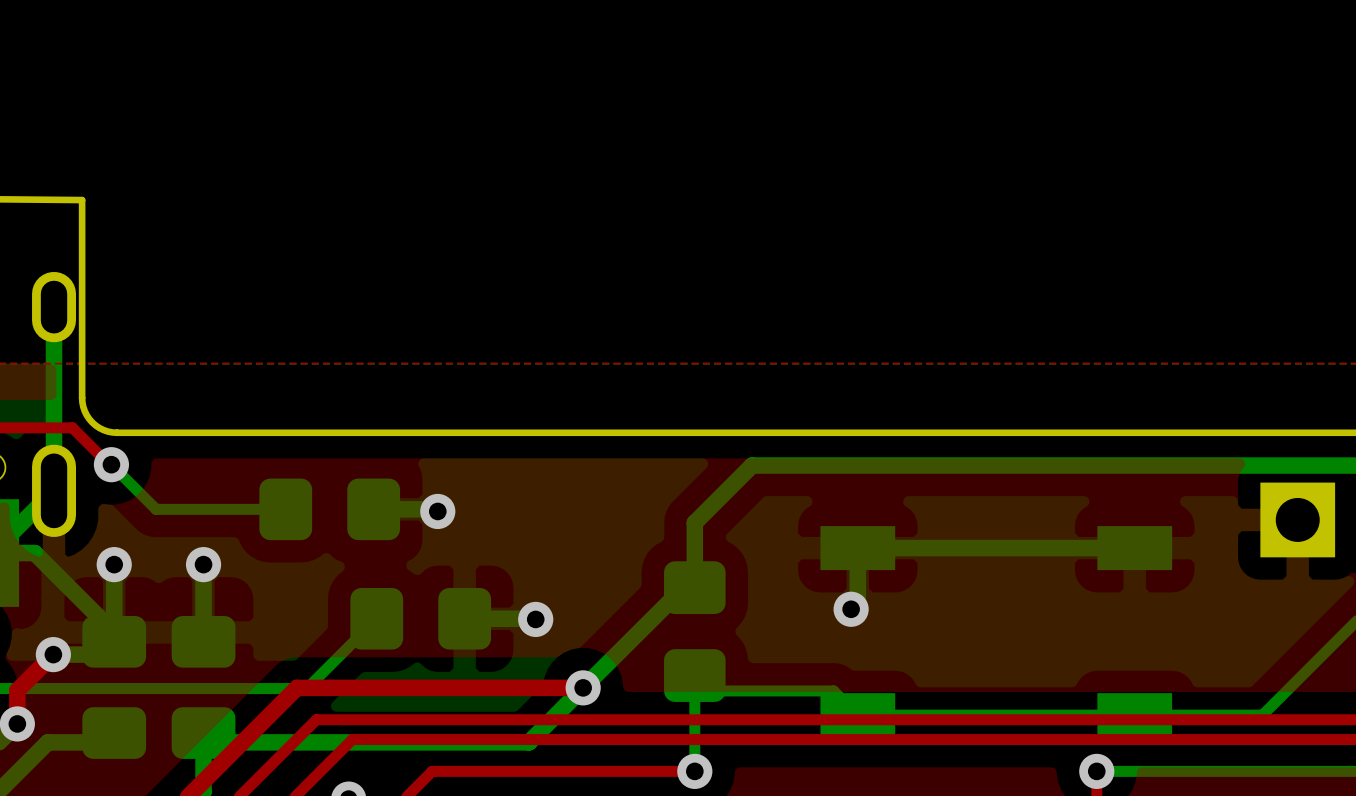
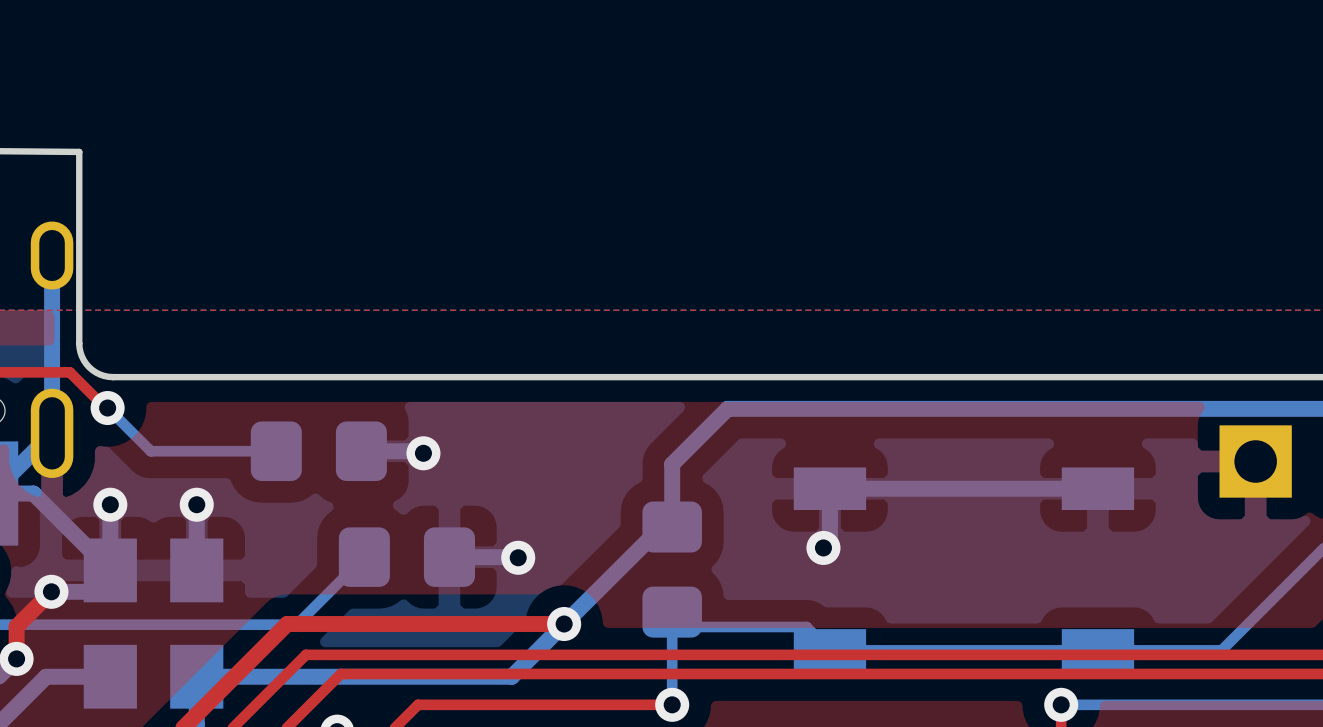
part footprint: [82, 616, 147, 759] -> [83, 538, 137, 709]
part footprint: [171, 616, 236, 759] -> [170, 538, 224, 709]

